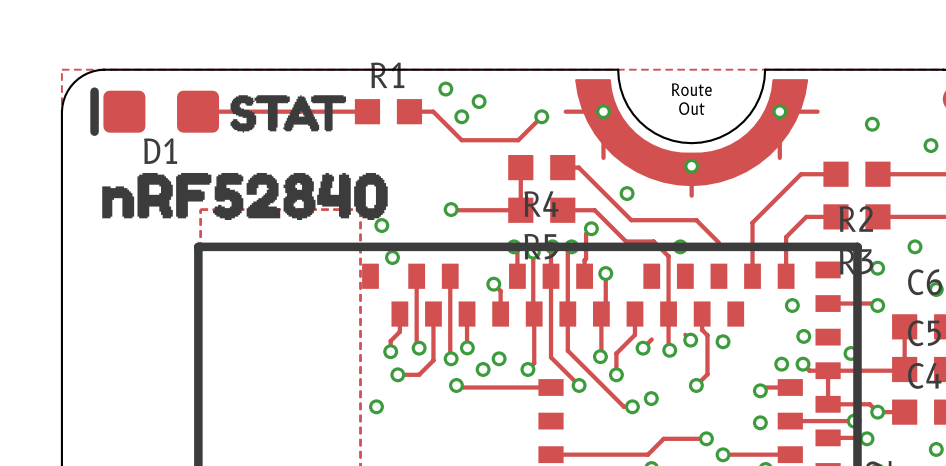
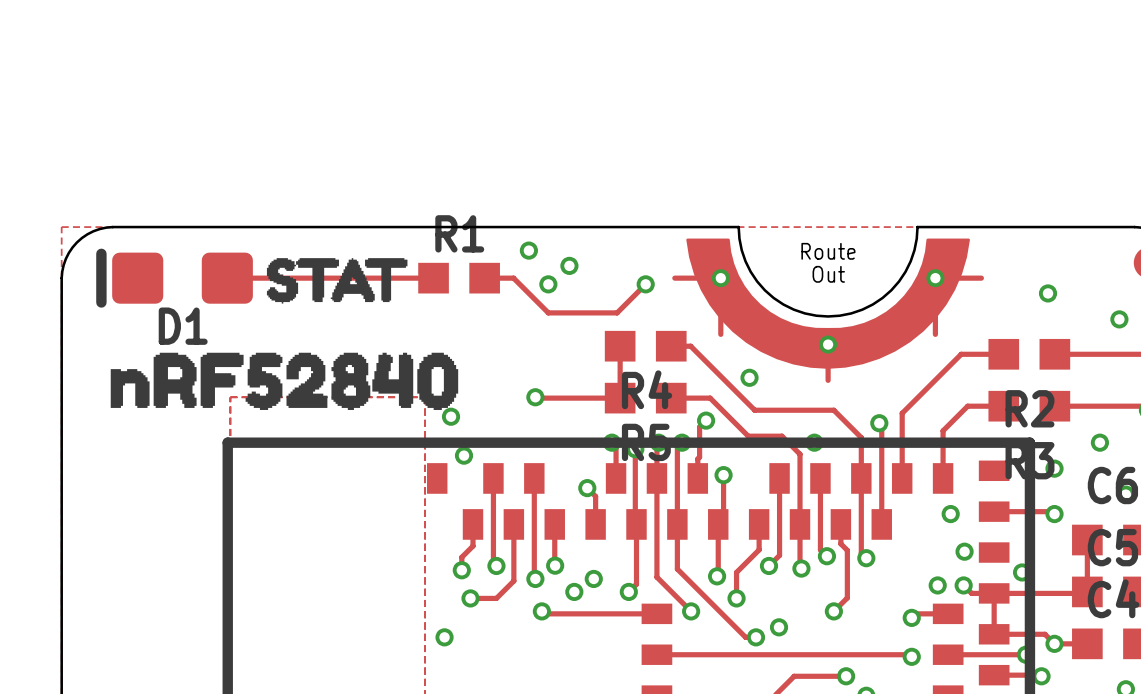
track: none -> (879, 423) (881, 425) (881, 524)
via: none -> (879, 423)
track: none -> (861, 437) (861, 553)
track: none -> (779, 478) (779, 555)
track: none -> (820, 478) (820, 549)
track: none -> (656, 654) (909, 654)

